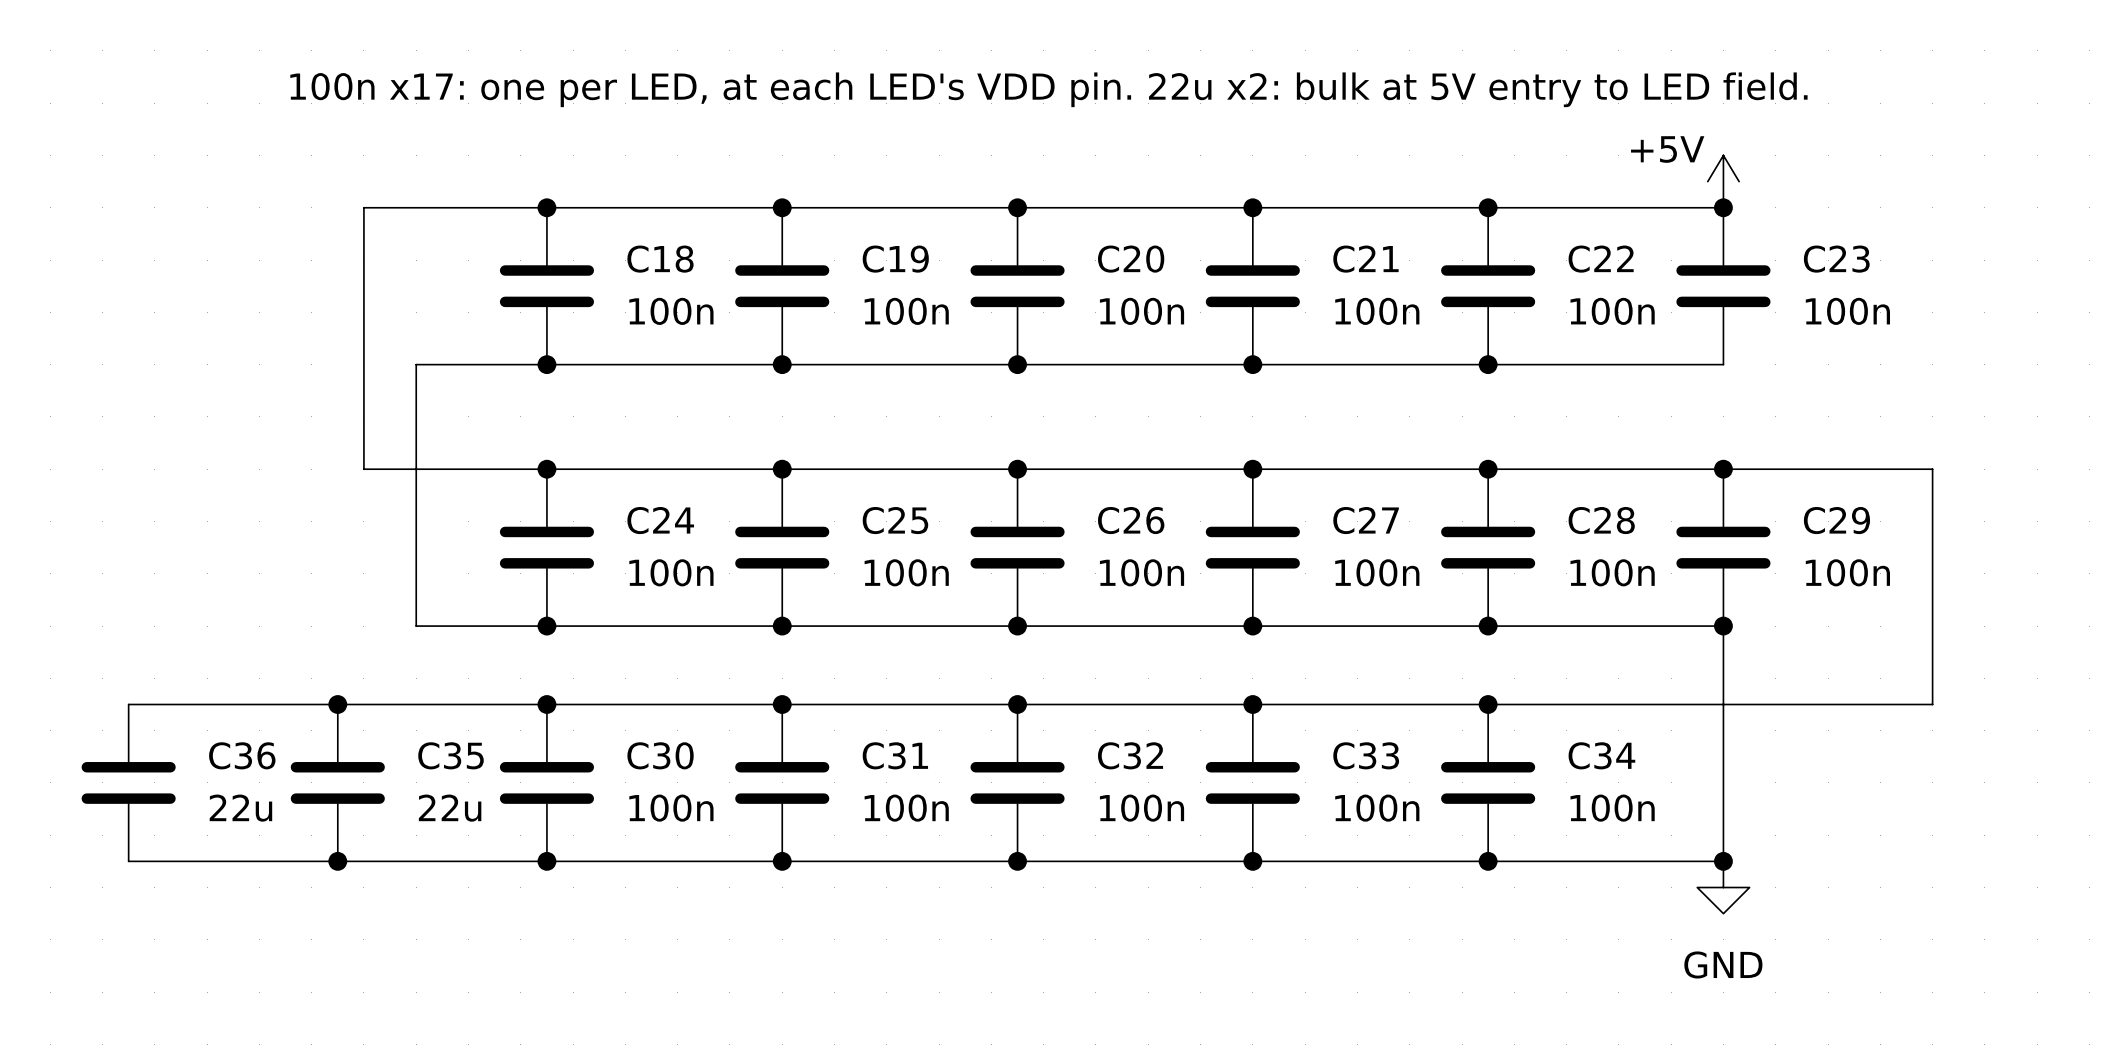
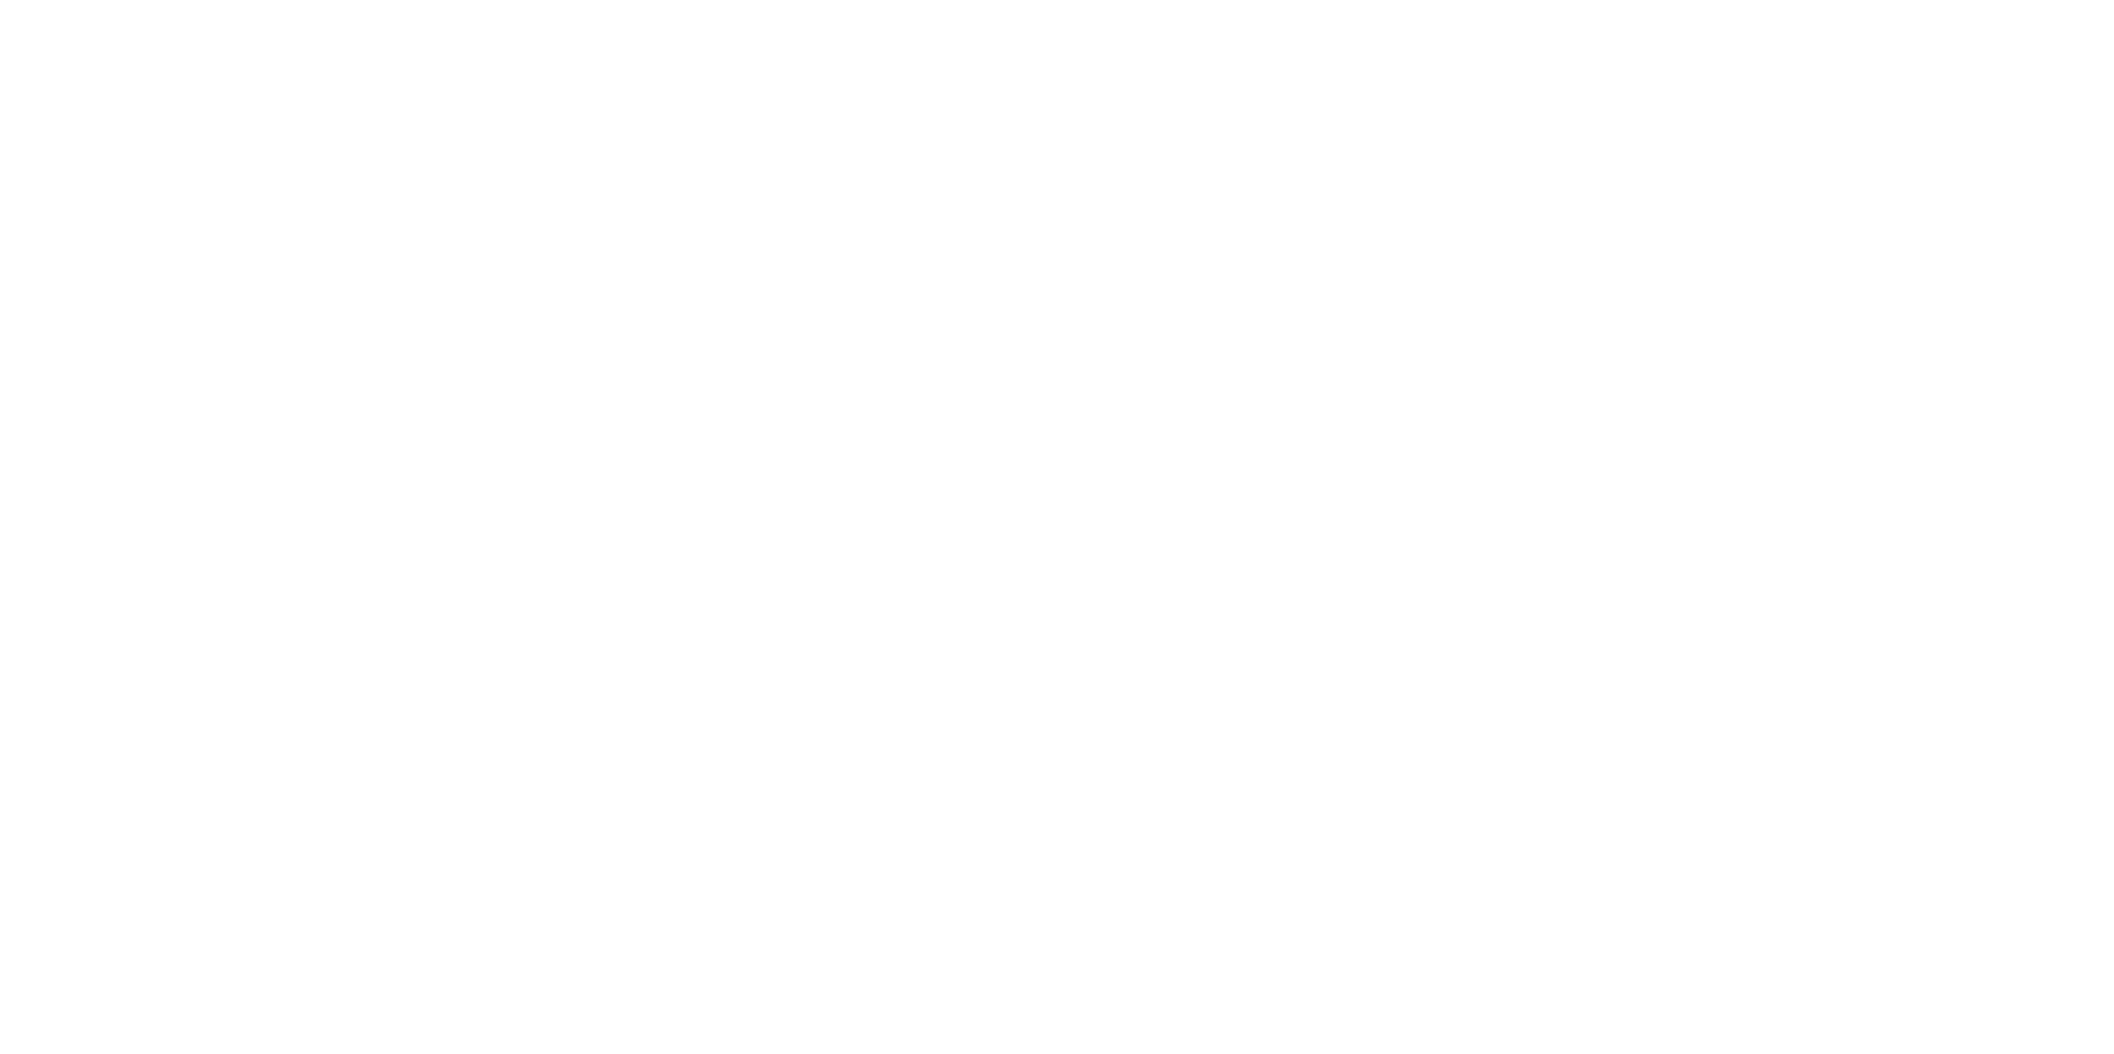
text: 100n x17: one per LED, at each LED's VDD pin. 22u x2: bulk at 5V entry to LED field. (1048, 89) -> none
power symbol: +5V (1723, 181) -> none
junction: (546, 207) -> none
junction: (782, 207) -> none
junction: (1017, 207) -> none
junction: (1252, 207) -> none
junction: (1488, 207) -> none
wire: (1723, 207) (363, 207) (363, 469) (1932, 469) (1932, 704) (128, 704) -> none
junction: (1723, 207) -> none
C18: 100n (546, 286) -> none
C19: 100n (782, 286) -> none
C20: 100n (1017, 286) -> none
C21: 100n (1252, 286) -> none
C22: 100n (1488, 286) -> none
C23: 100n (1723, 286) -> none
junction: (546, 364) -> none
junction: (782, 364) -> none
junction: (1017, 364) -> none
junction: (1252, 364) -> none
junction: (1488, 364) -> none
wire: (1723, 364) (416, 364) (416, 626) (1723, 626) (1723, 861) (128, 861) -> none
junction: (546, 469) -> none
junction: (782, 469) -> none
junction: (1017, 469) -> none
junction: (1252, 469) -> none
junction: (1488, 469) -> none
junction: (1723, 469) -> none
C24: 100n (546, 547) -> none
C25: 100n (782, 547) -> none
C26: 100n (1017, 547) -> none
C27: 100n (1252, 547) -> none
C28: 100n (1488, 547) -> none
C29: 100n (1723, 547) -> none
junction: (546, 626) -> none
junction: (782, 626) -> none
junction: (1017, 626) -> none
junction: (1252, 626) -> none
junction: (1488, 626) -> none
junction: (1723, 626) -> none
junction: (337, 704) -> none
junction: (546, 704) -> none
junction: (782, 704) -> none
junction: (1017, 704) -> none
junction: (1252, 704) -> none
junction: (1488, 704) -> none
C36: 22u (128, 782) -> none
C35: 22u (337, 782) -> none
C30: 100n (546, 782) -> none
C31: 100n (782, 782) -> none
C32: 100n (1017, 782) -> none
C33: 100n (1252, 782) -> none
C34: 100n (1488, 782) -> none
junction: (337, 861) -> none
junction: (546, 861) -> none
junction: (782, 861) -> none
junction: (1017, 861) -> none
junction: (1252, 861) -> none
junction: (1488, 861) -> none
junction: (1723, 861) -> none
power symbol: GND (1723, 887) -> none

